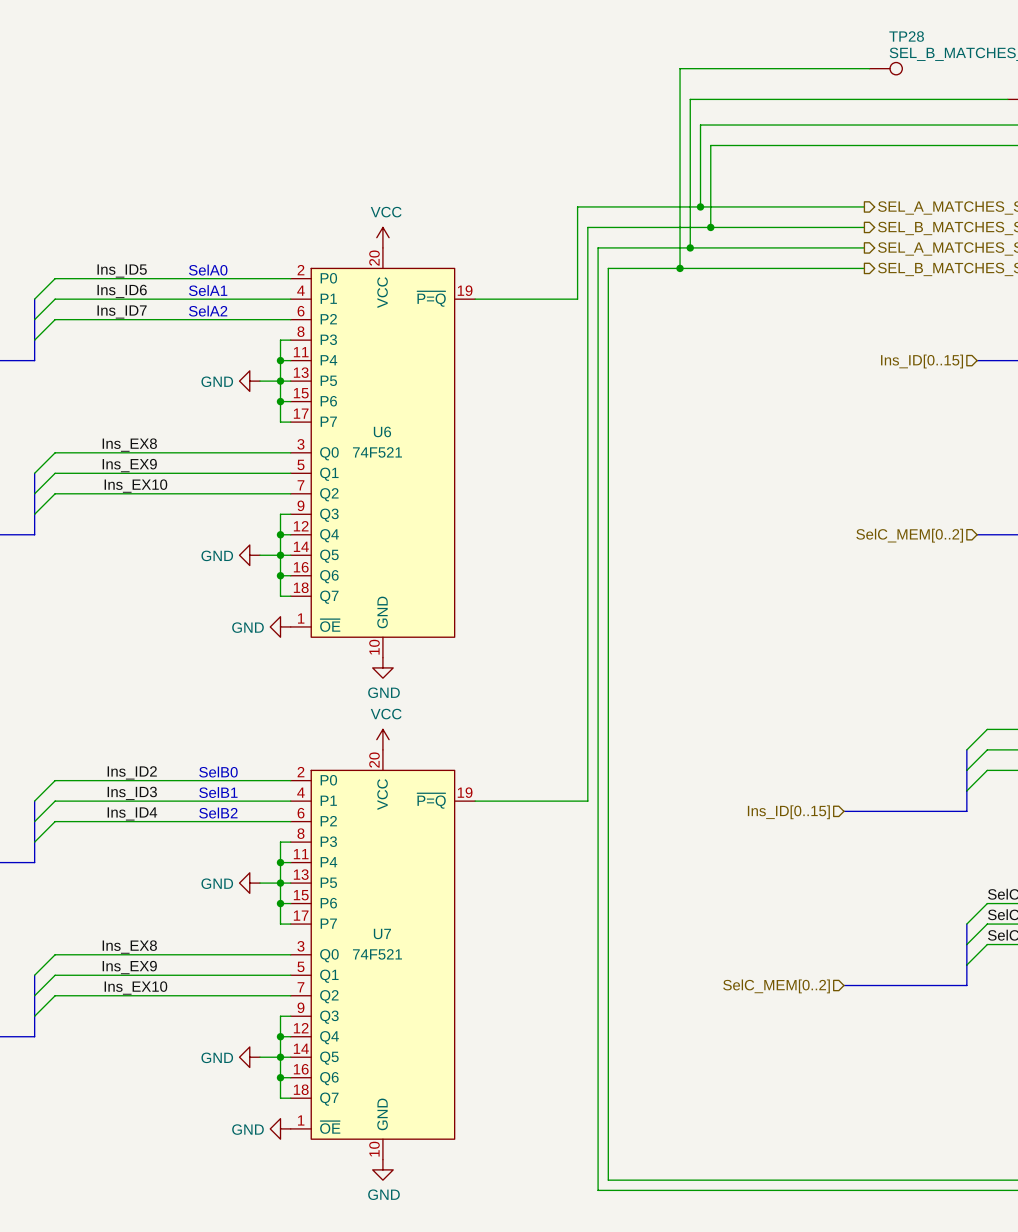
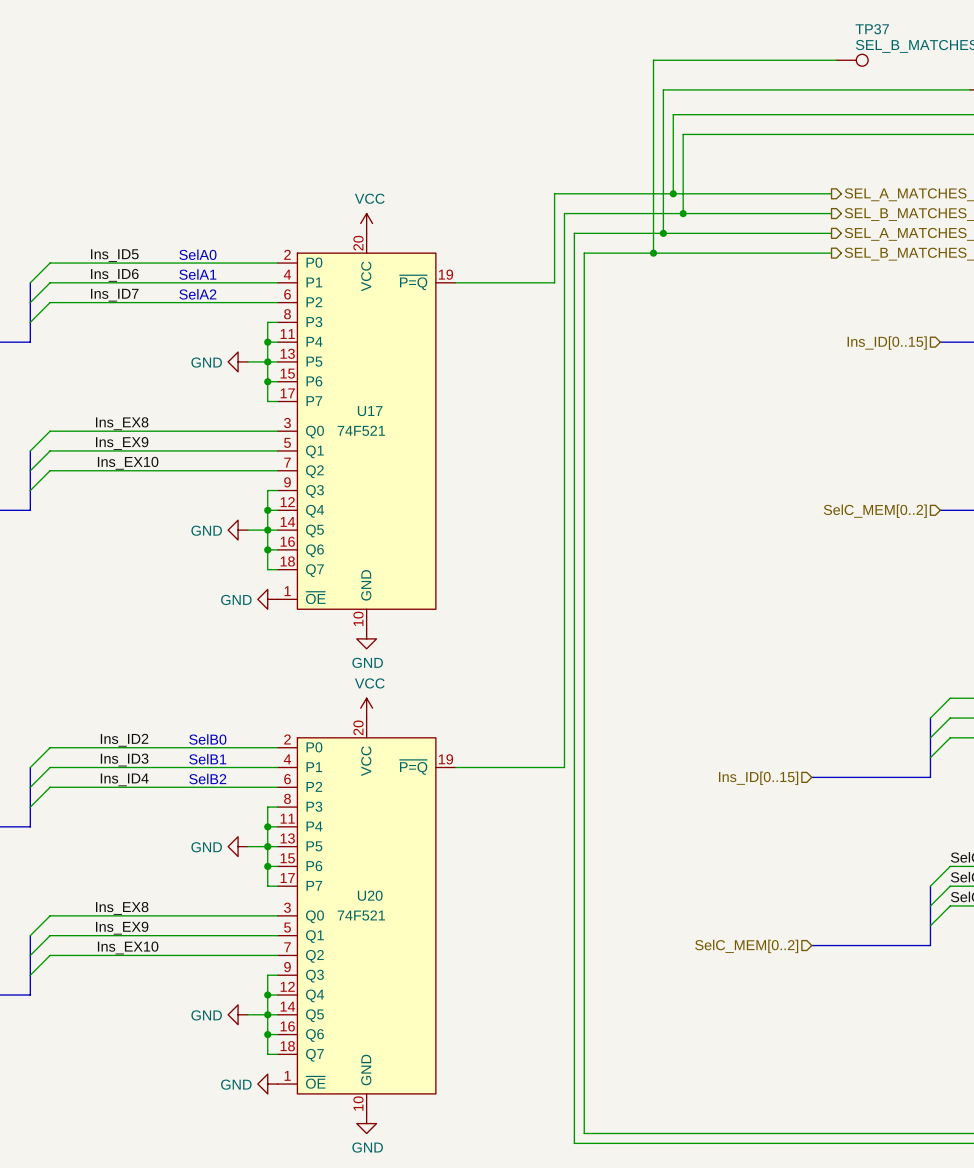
TP28 name: TP28 (906, 36) -> TP37 (872, 29)
U6 name: U6 (382, 431) -> U17 (370, 411)
U7 name: U7 (382, 933) -> U20 (370, 895)

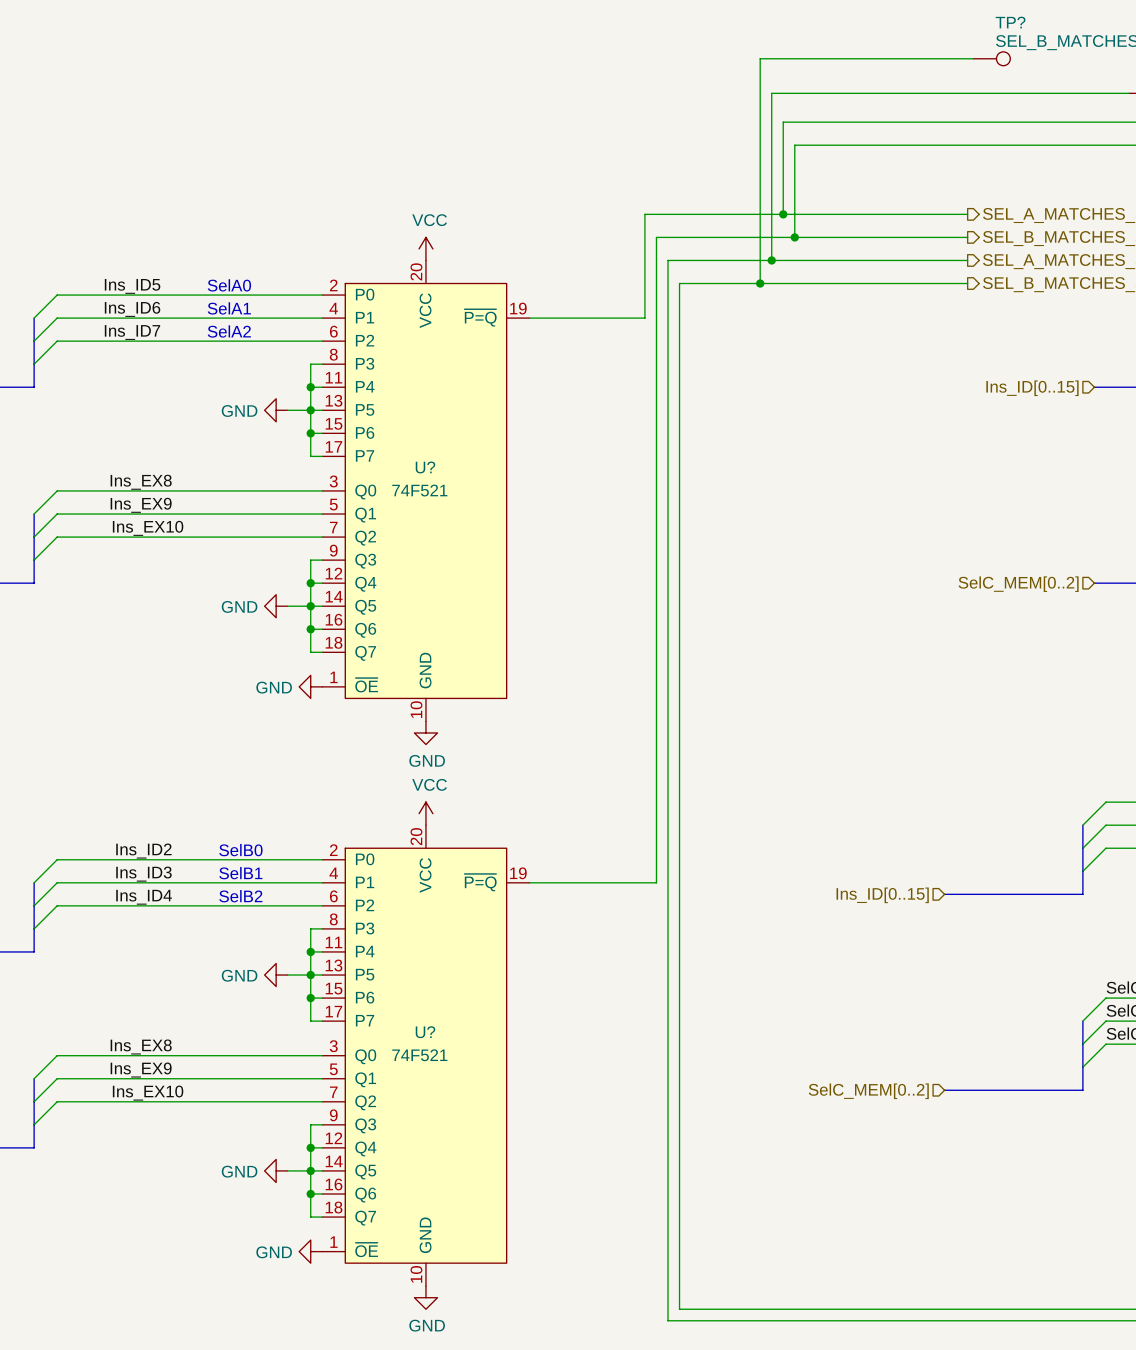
TP37 name: TP37 (872, 29) -> TP? (1010, 22)
U17 name: U17 (370, 411) -> U? (425, 467)
U20 name: U20 (370, 895) -> U? (425, 1032)

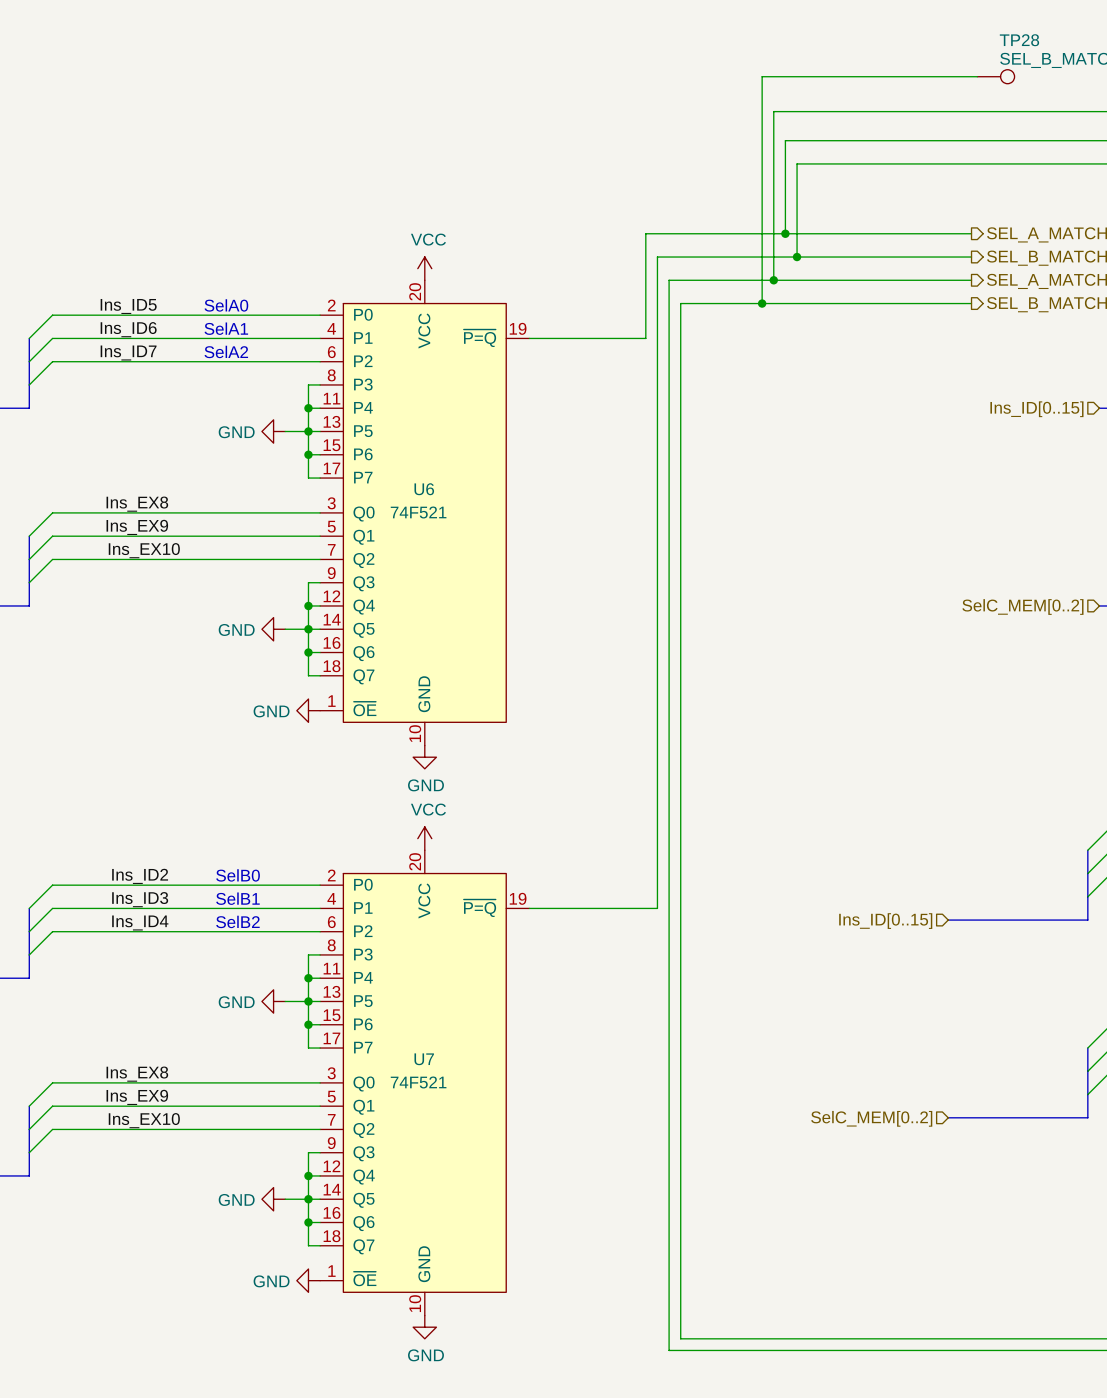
TP? name: TP? (1010, 22) -> TP28 (1019, 40)
U? name: U? (425, 467) -> U6 (424, 489)
U? name: U? (425, 1032) -> U7 (424, 1059)

